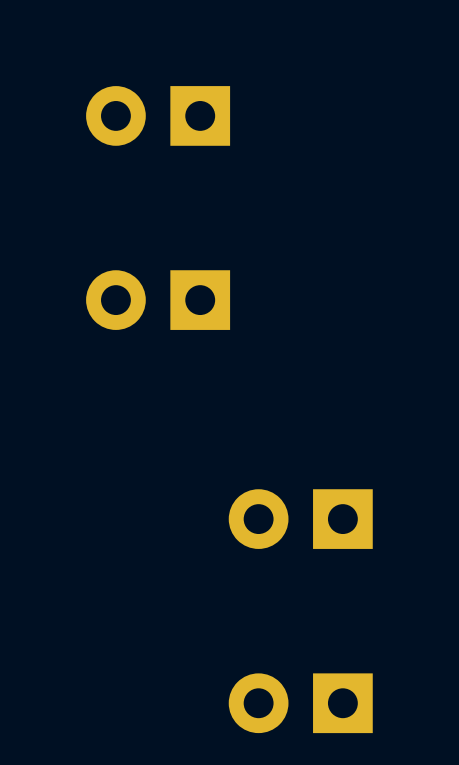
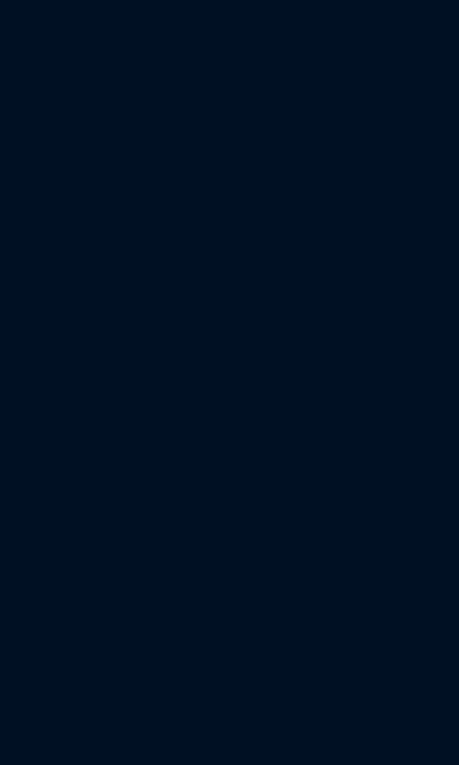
part: (158, 115) -> none
part: (158, 300) -> none
part: (300, 519) -> none
part: (300, 703) -> none

